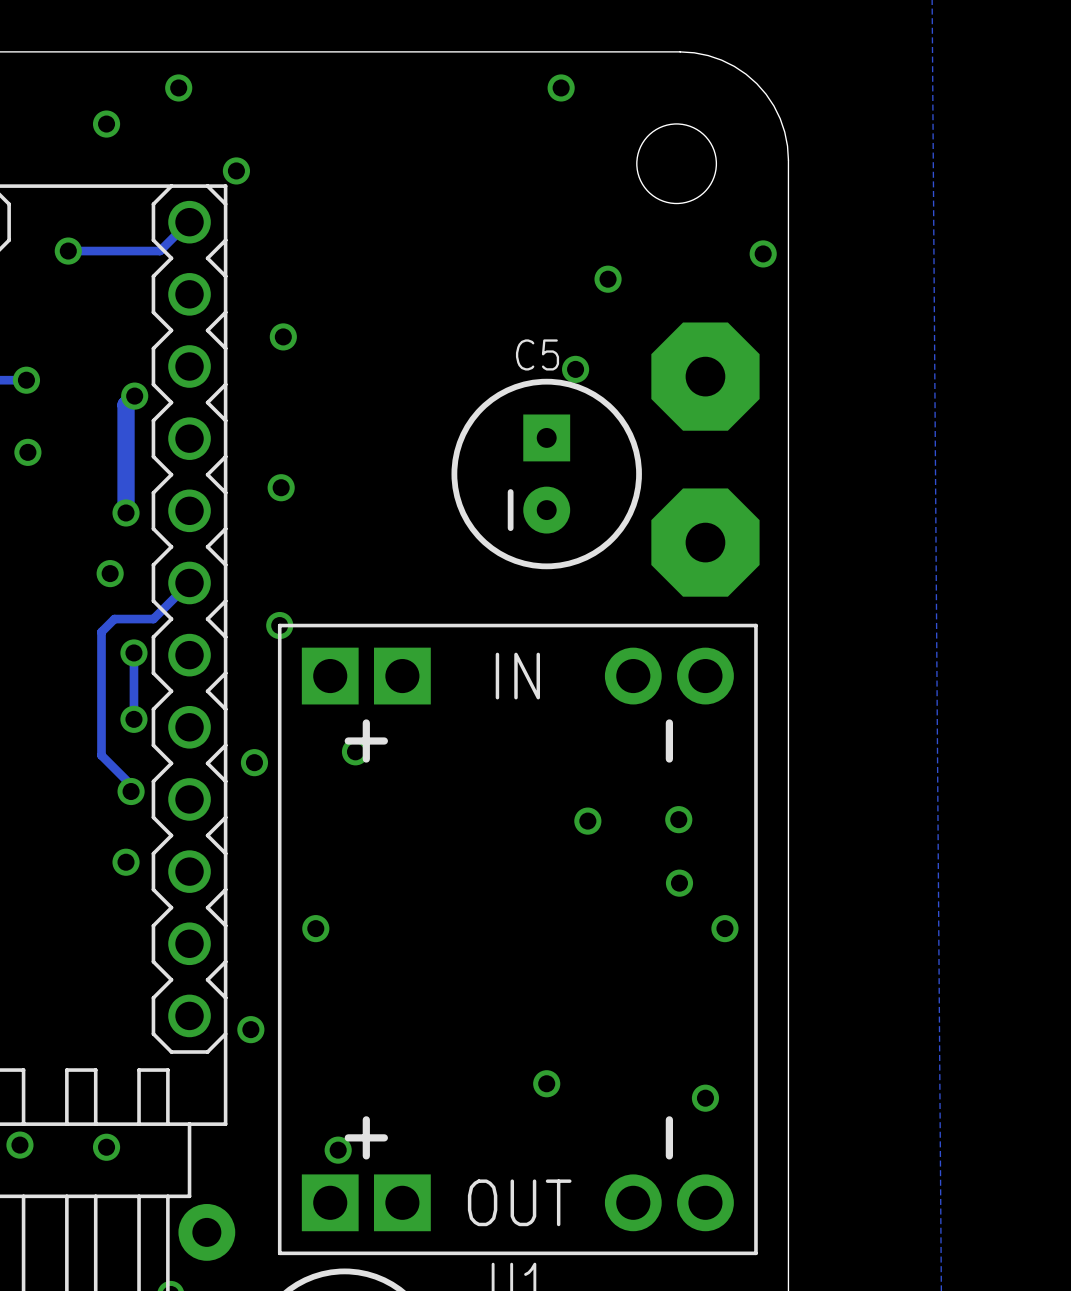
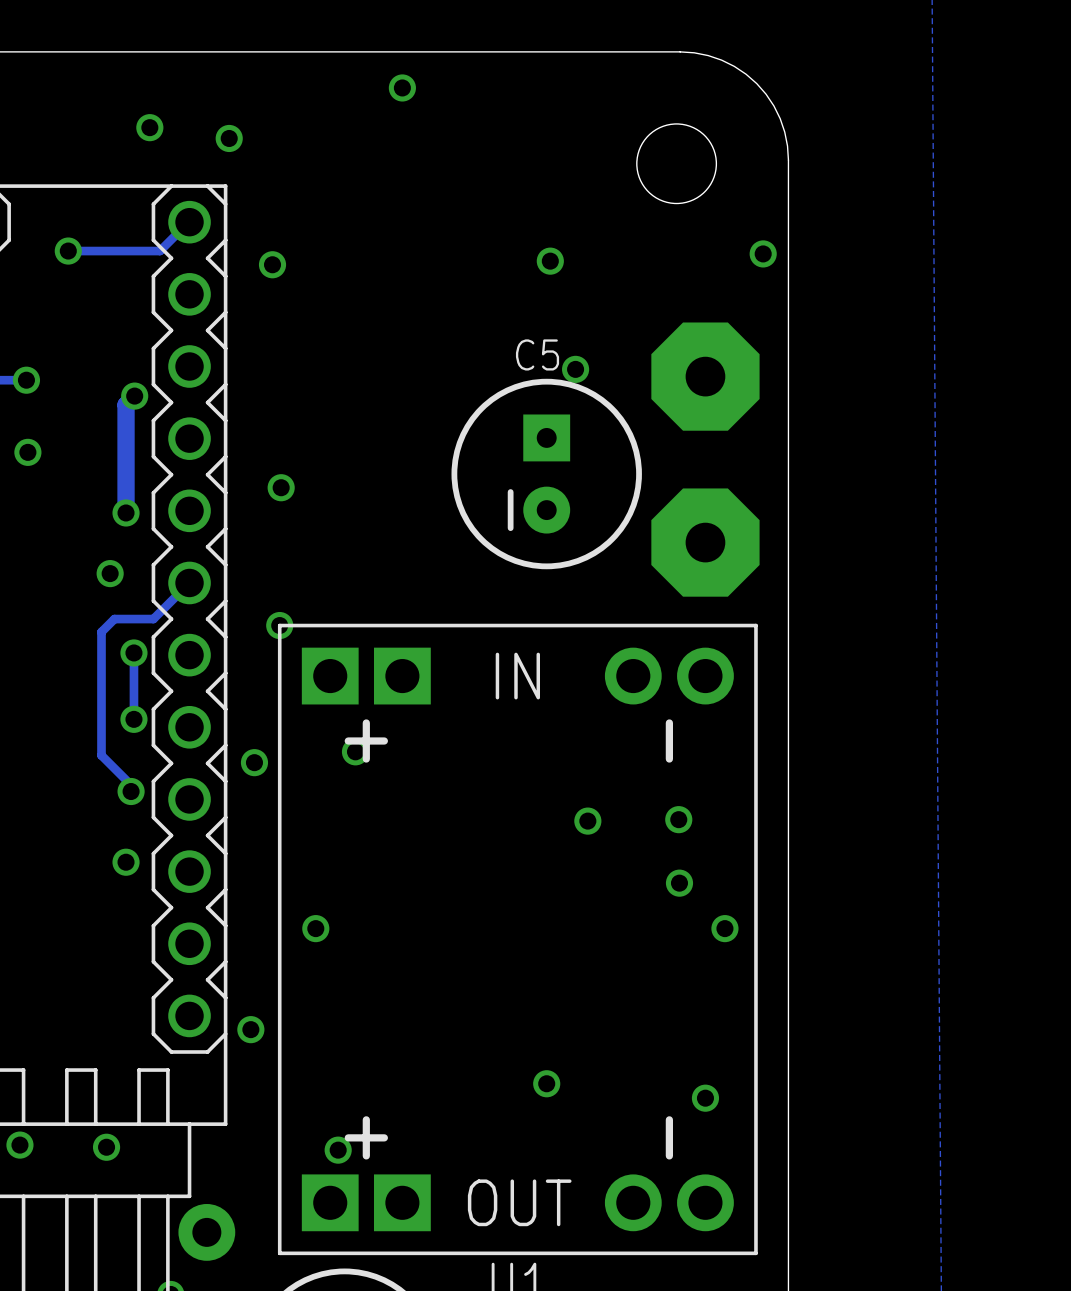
via: (178, 87) -> none
via: none -> (402, 87)
via: (561, 87) -> none
via: (106, 124) -> none
via: none -> (149, 127)
via position: (236, 170) -> (229, 138)
via: none -> (272, 264)
via position: (608, 279) -> (550, 261)
via: (283, 336) -> none

